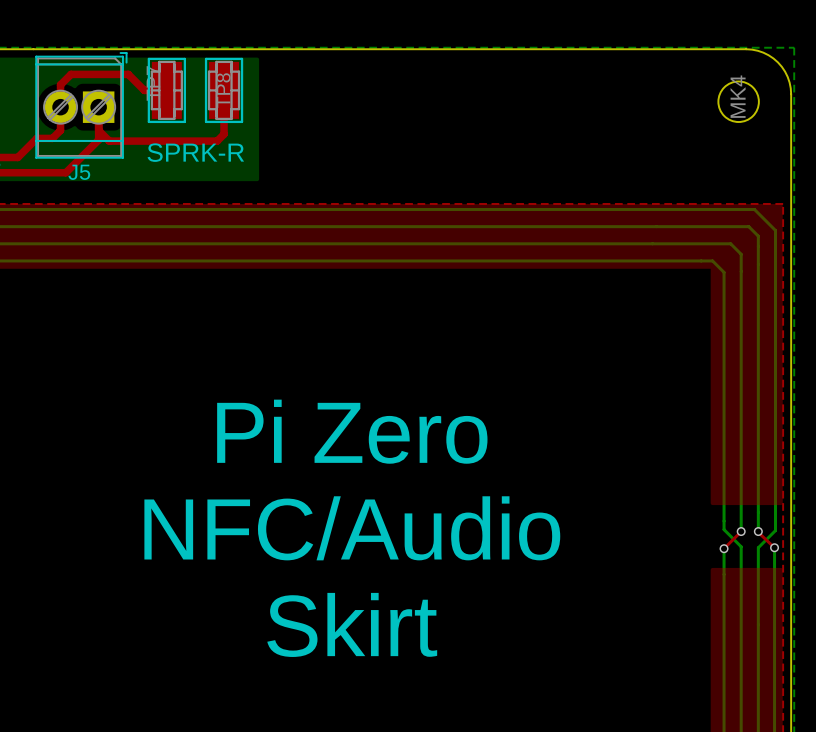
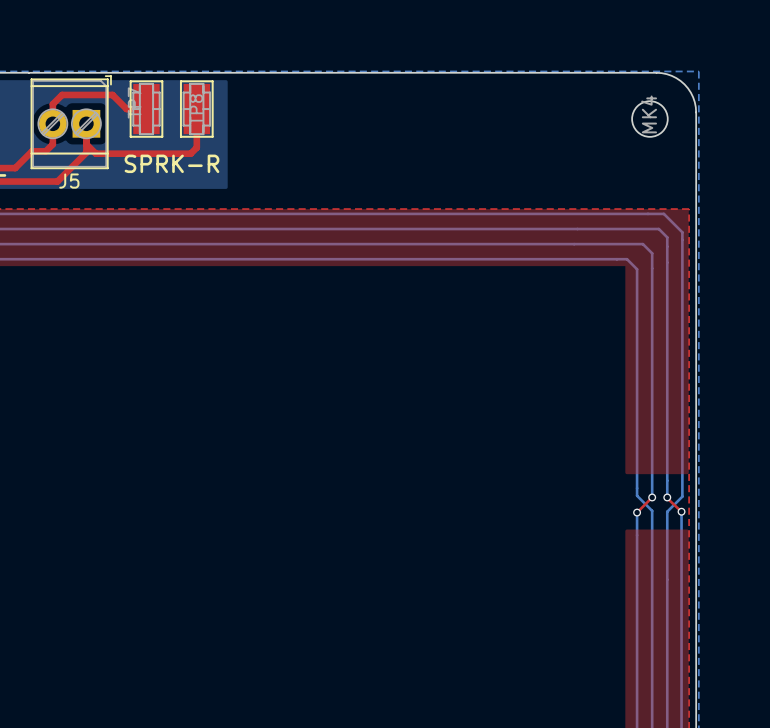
text: Pi Zero (352, 431) -> none
text: NFC/Audio (352, 528) -> none
text: Skirt (352, 624) -> none

